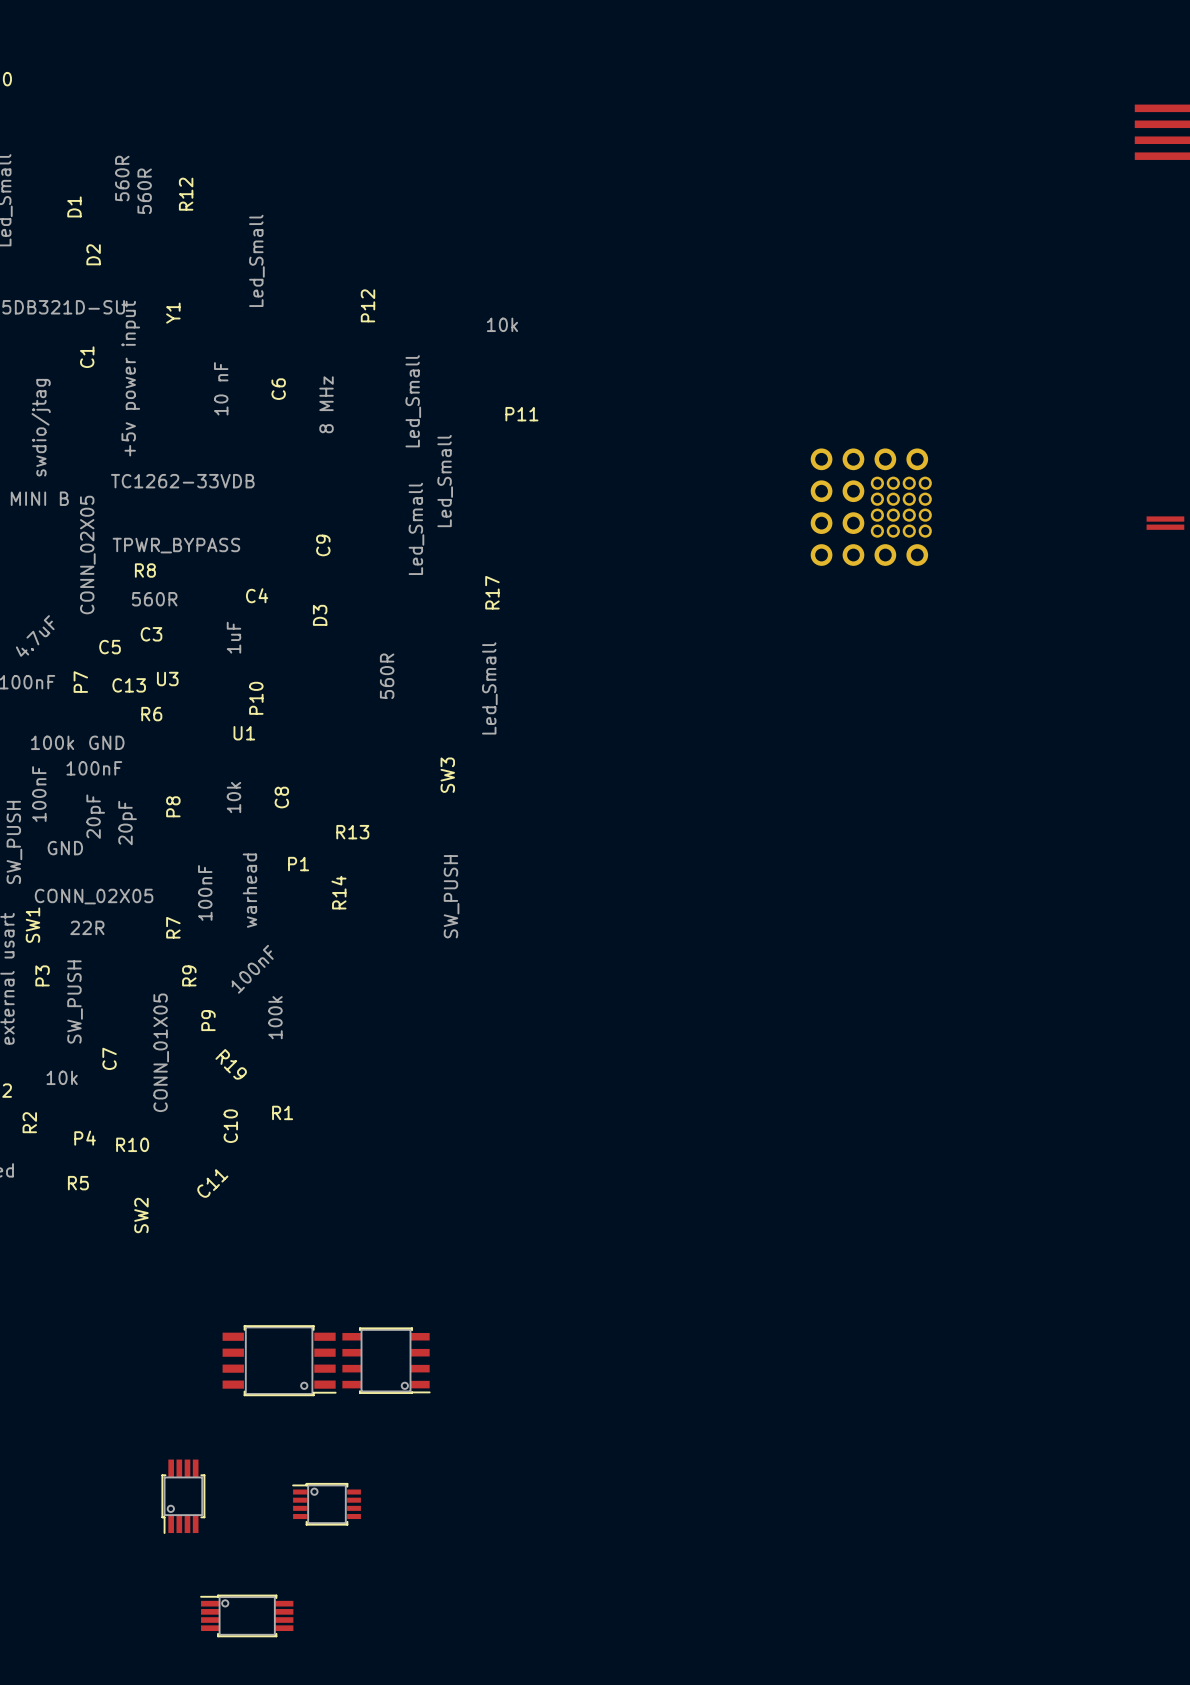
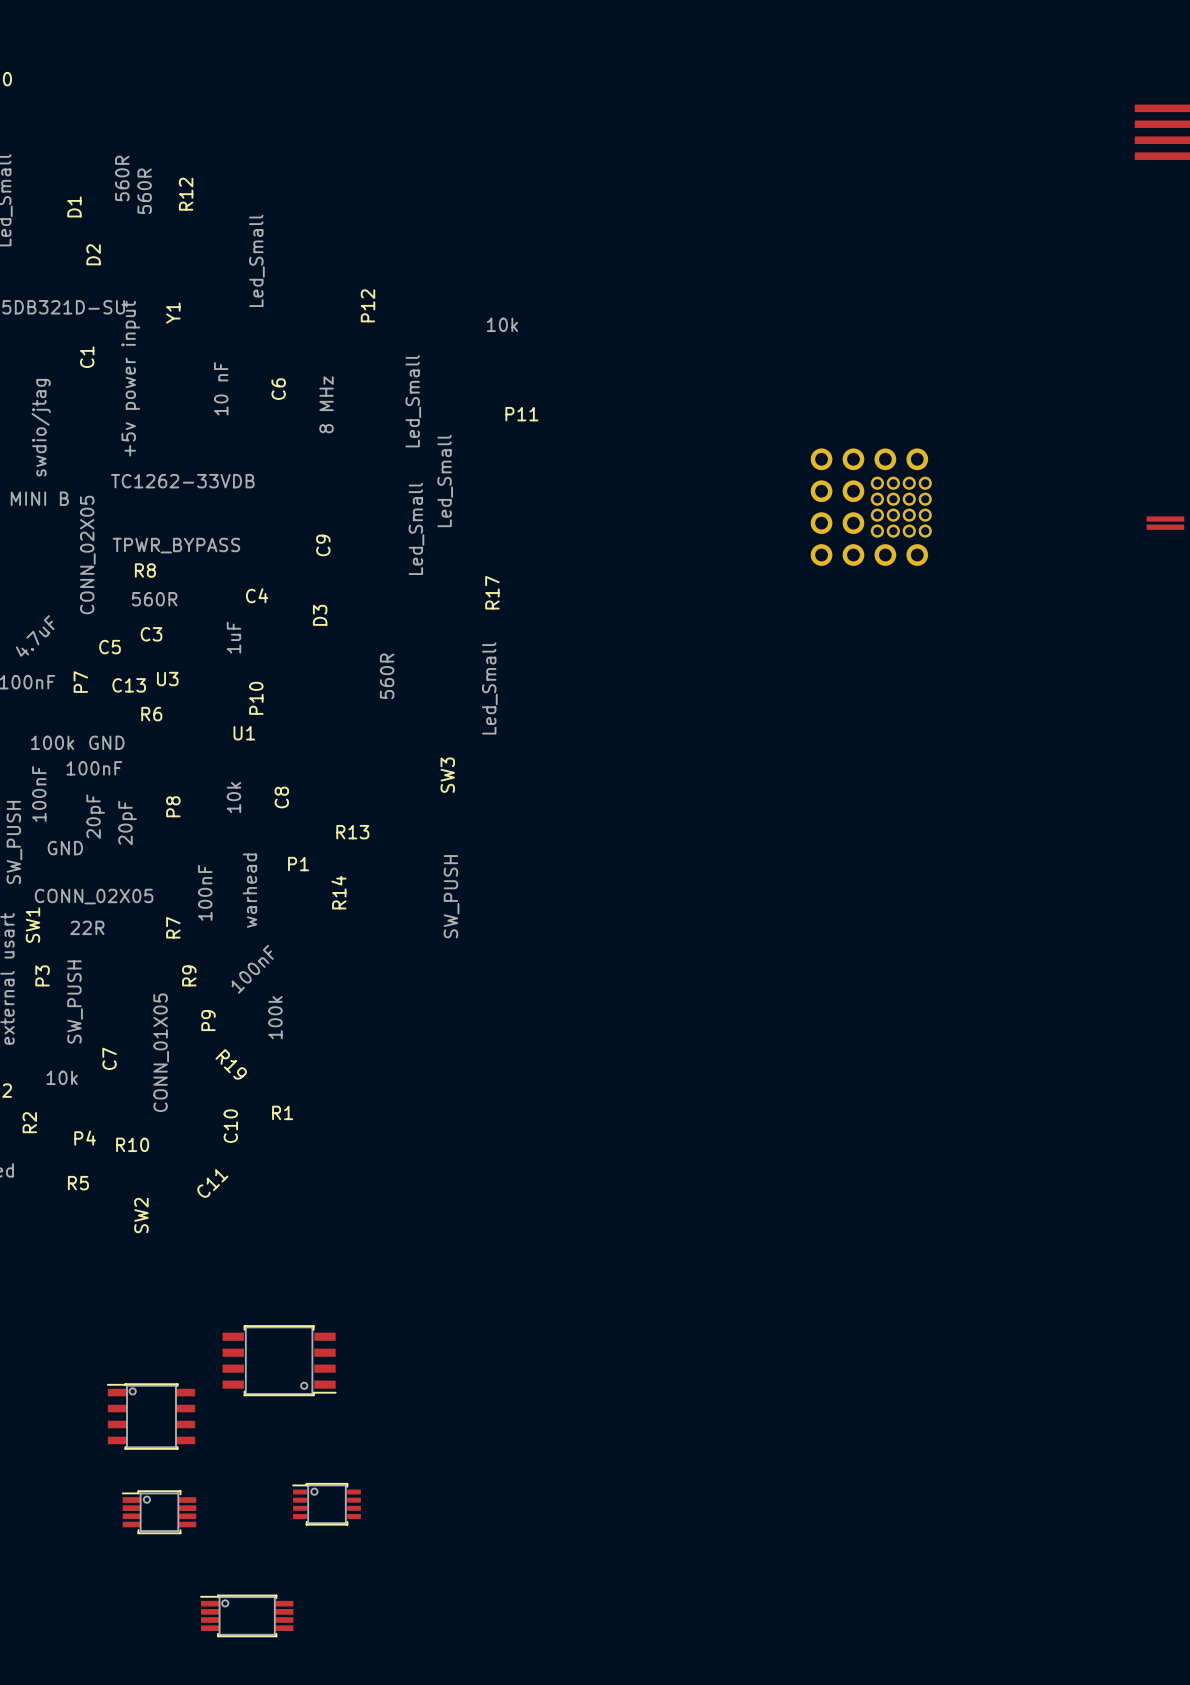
part rotation: 0° (386, 1360) -> 180° (151, 1416)
part position: (386, 1360) -> (151, 1416)
part rotation: 0° (183, 1496) -> 90° clockwise (159, 1512)

